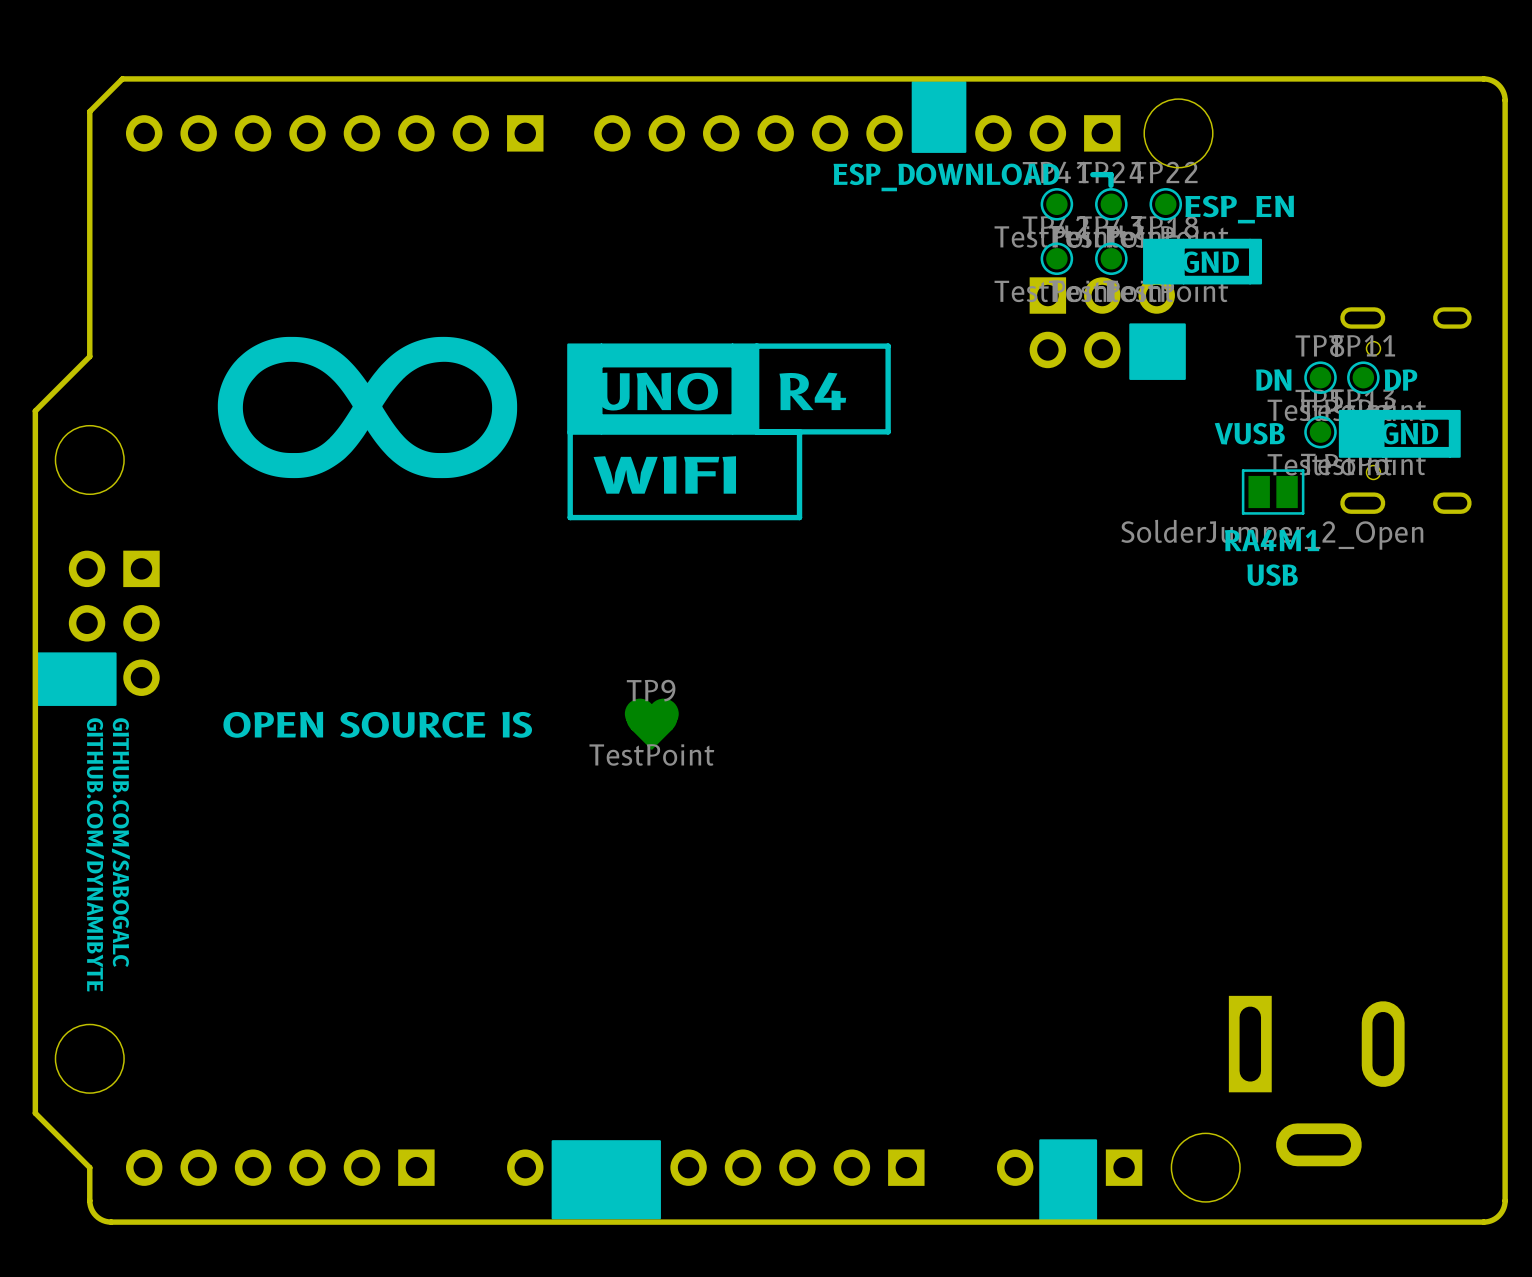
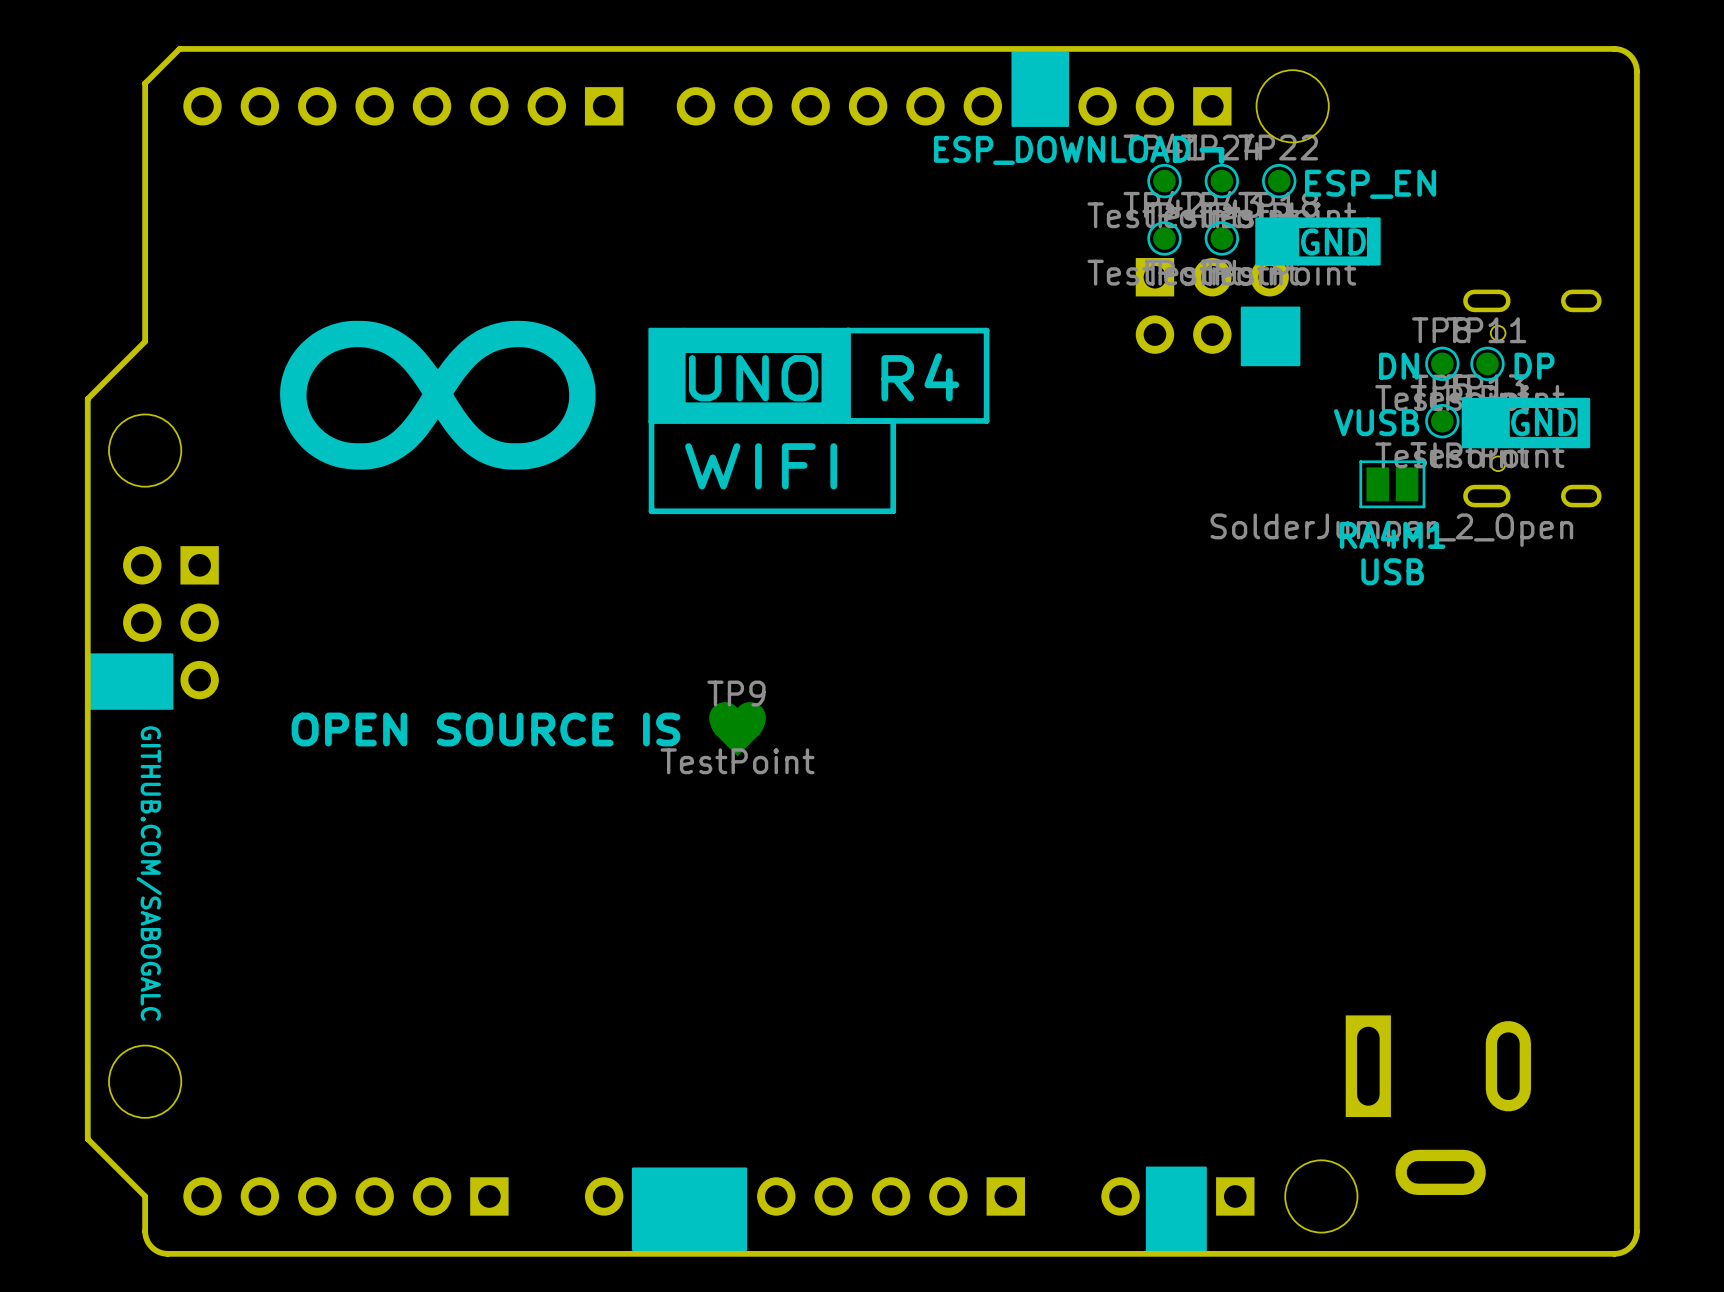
text: GITHUB.COM/SABOGALC (120, 842) -> none
text: GITHUB.COM/DYNAMIBYTE (95, 854) -> GITHUB.COM/SABOGALC (149, 873)

